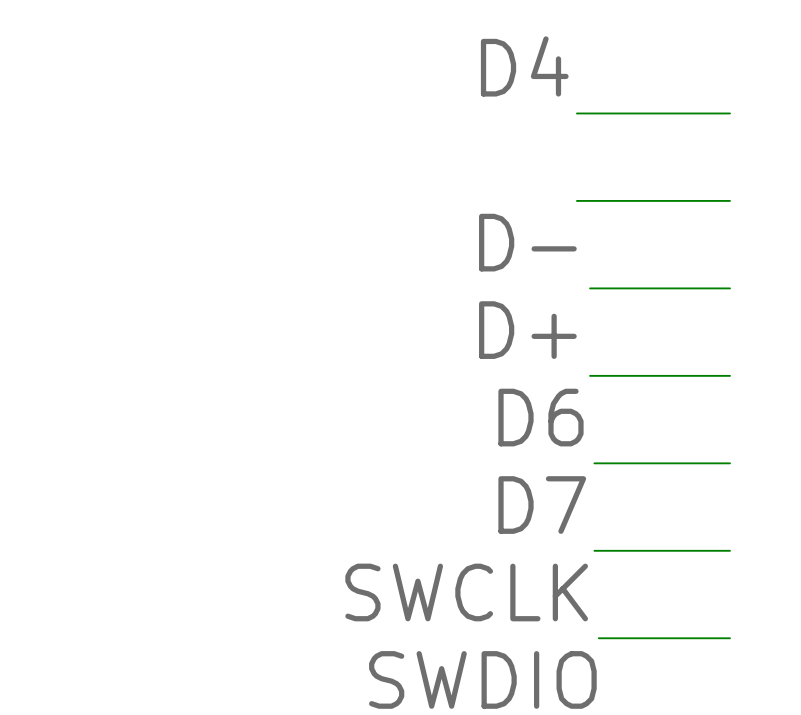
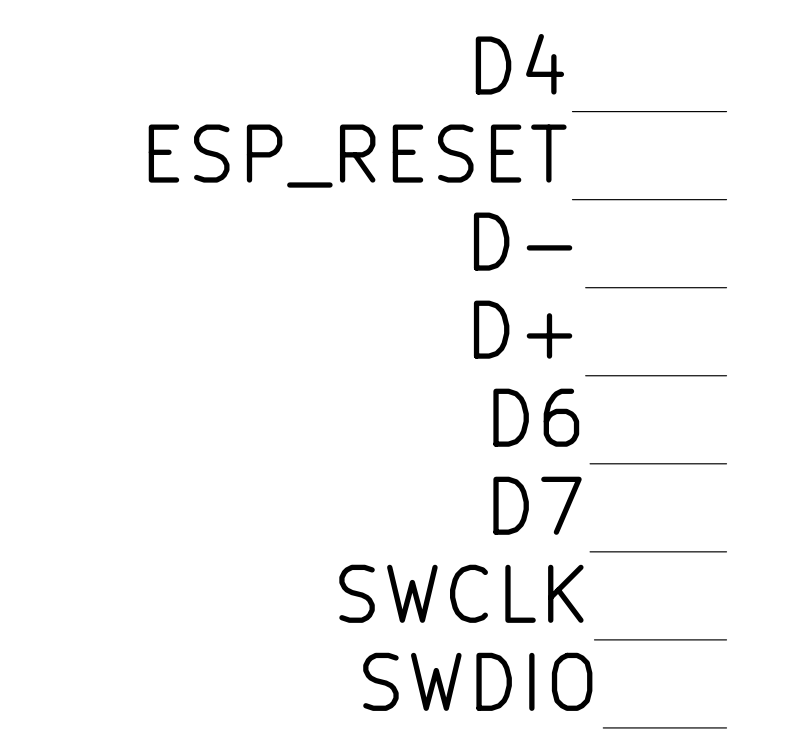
label: none -> ESP_RESET (357, 156)

